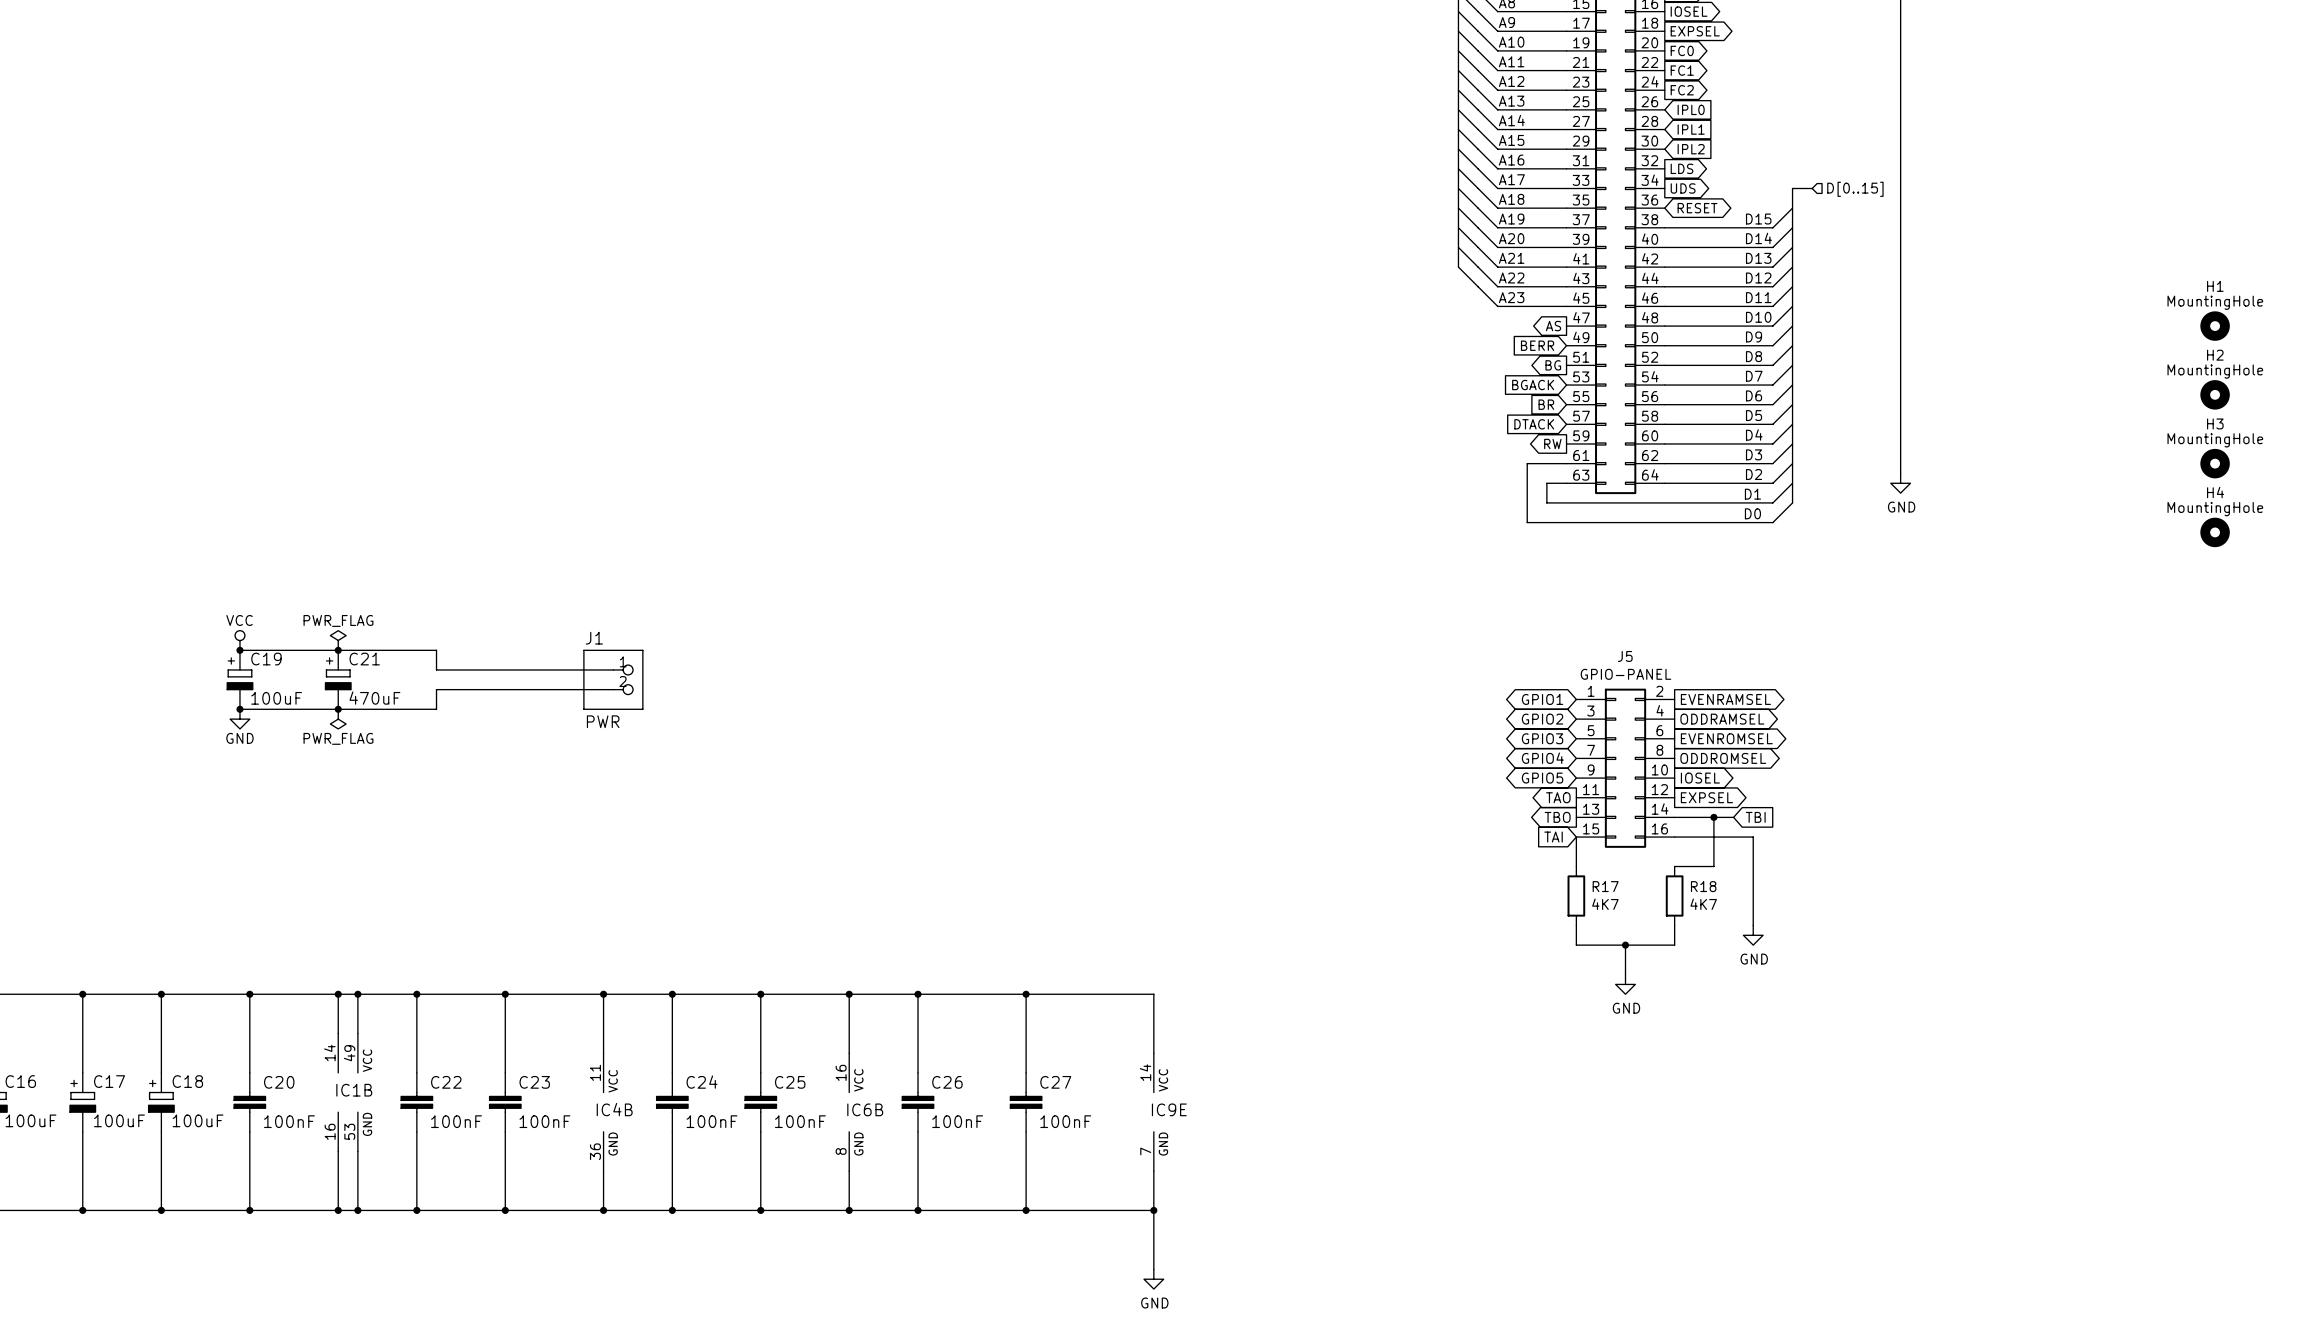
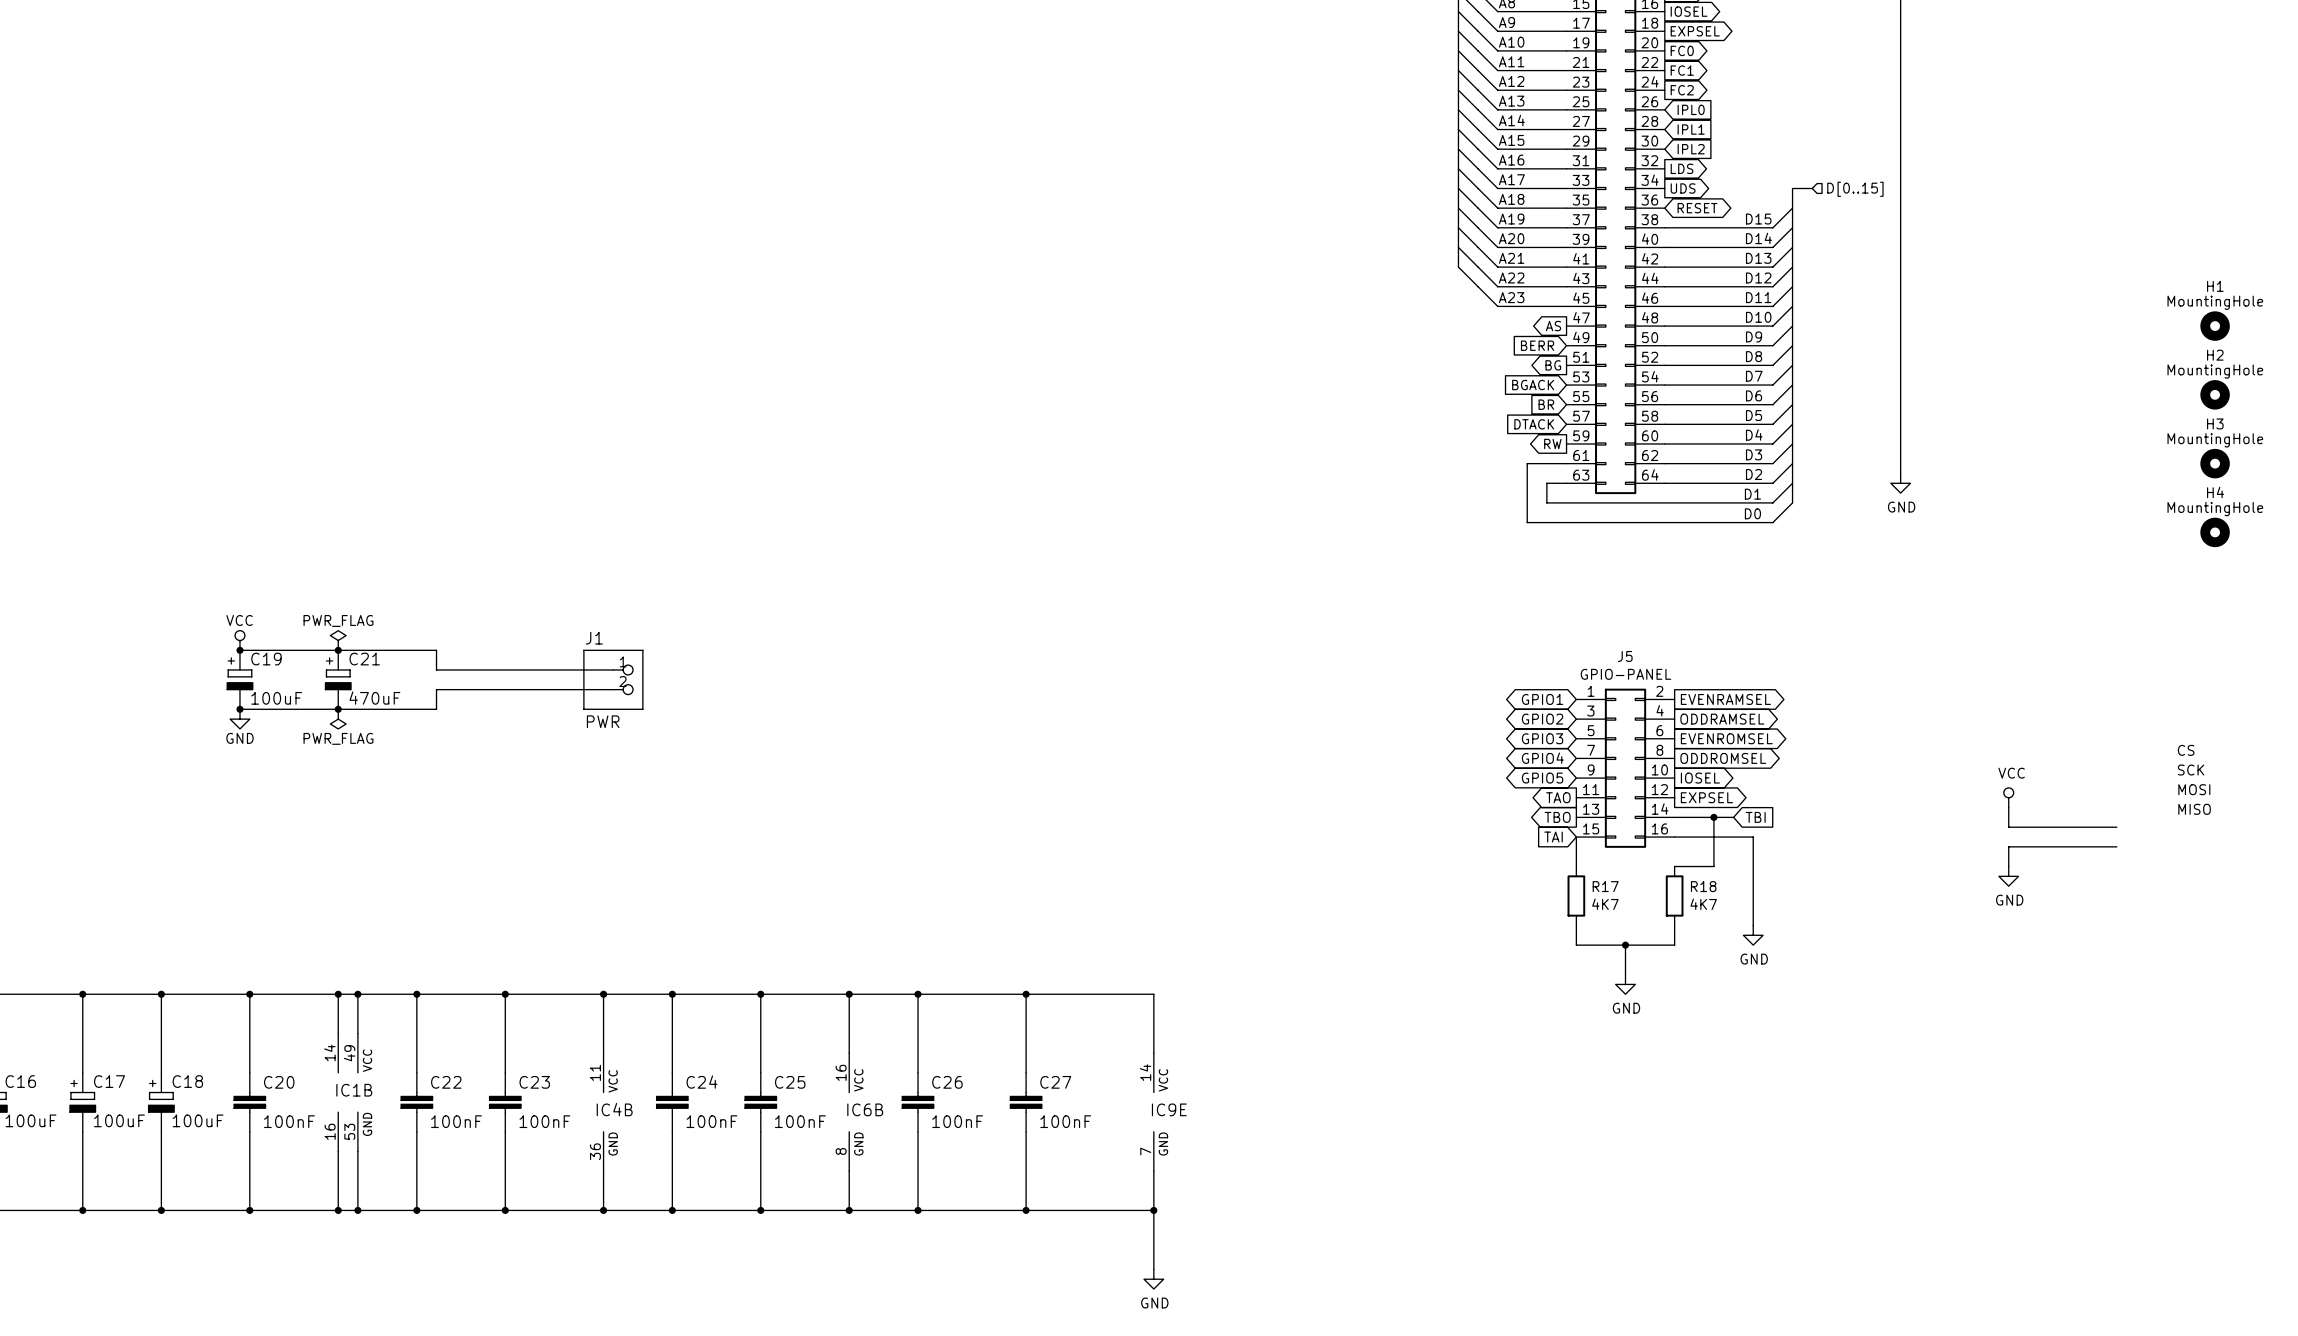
text: none -> CS (2186, 750)
text: none -> SCK (2191, 770)
text: none -> MOSI (2194, 789)
power symbol: none -> VCC (2008, 797)
wire: none -> (2008, 807) (2008, 827) (2116, 827)
text: none -> MISO (2194, 809)
wire: none -> (2116, 846) (2008, 846) (2008, 866)
power symbol: none -> GND (2008, 876)

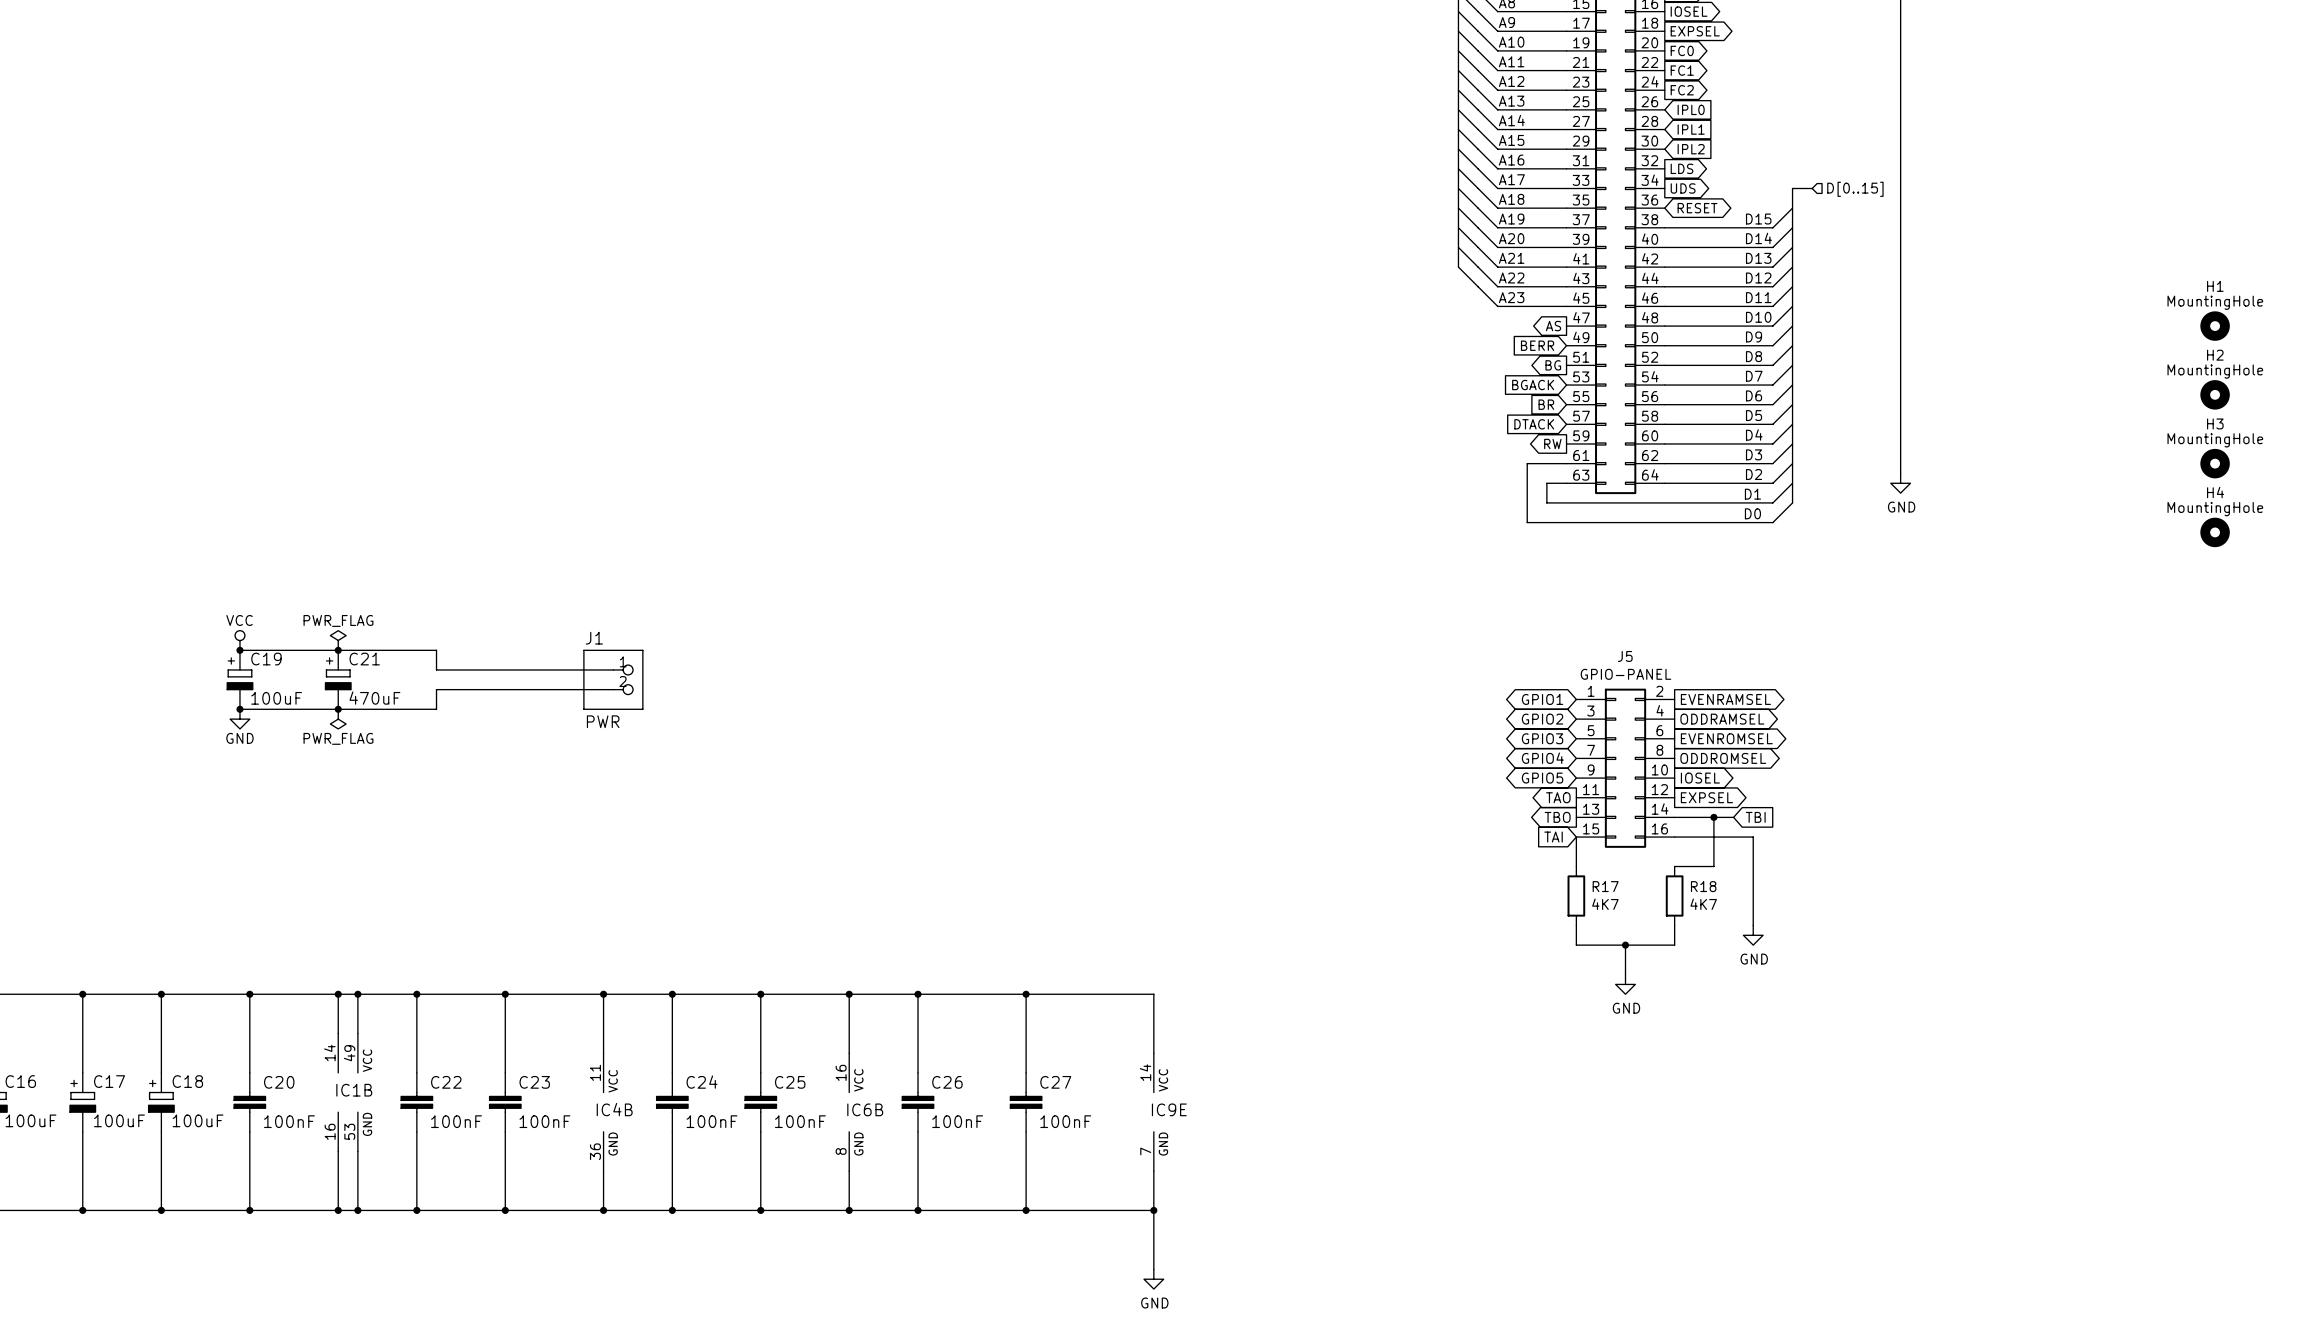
text: CS (2186, 750) -> none
text: SCK (2191, 770) -> none
text: MOSI (2194, 789) -> none
power symbol: VCC (2008, 797) -> none
wire: (2008, 807) (2008, 827) (2116, 827) -> none
text: MISO (2194, 809) -> none
wire: (2116, 846) (2008, 846) (2008, 866) -> none
power symbol: GND (2008, 876) -> none

